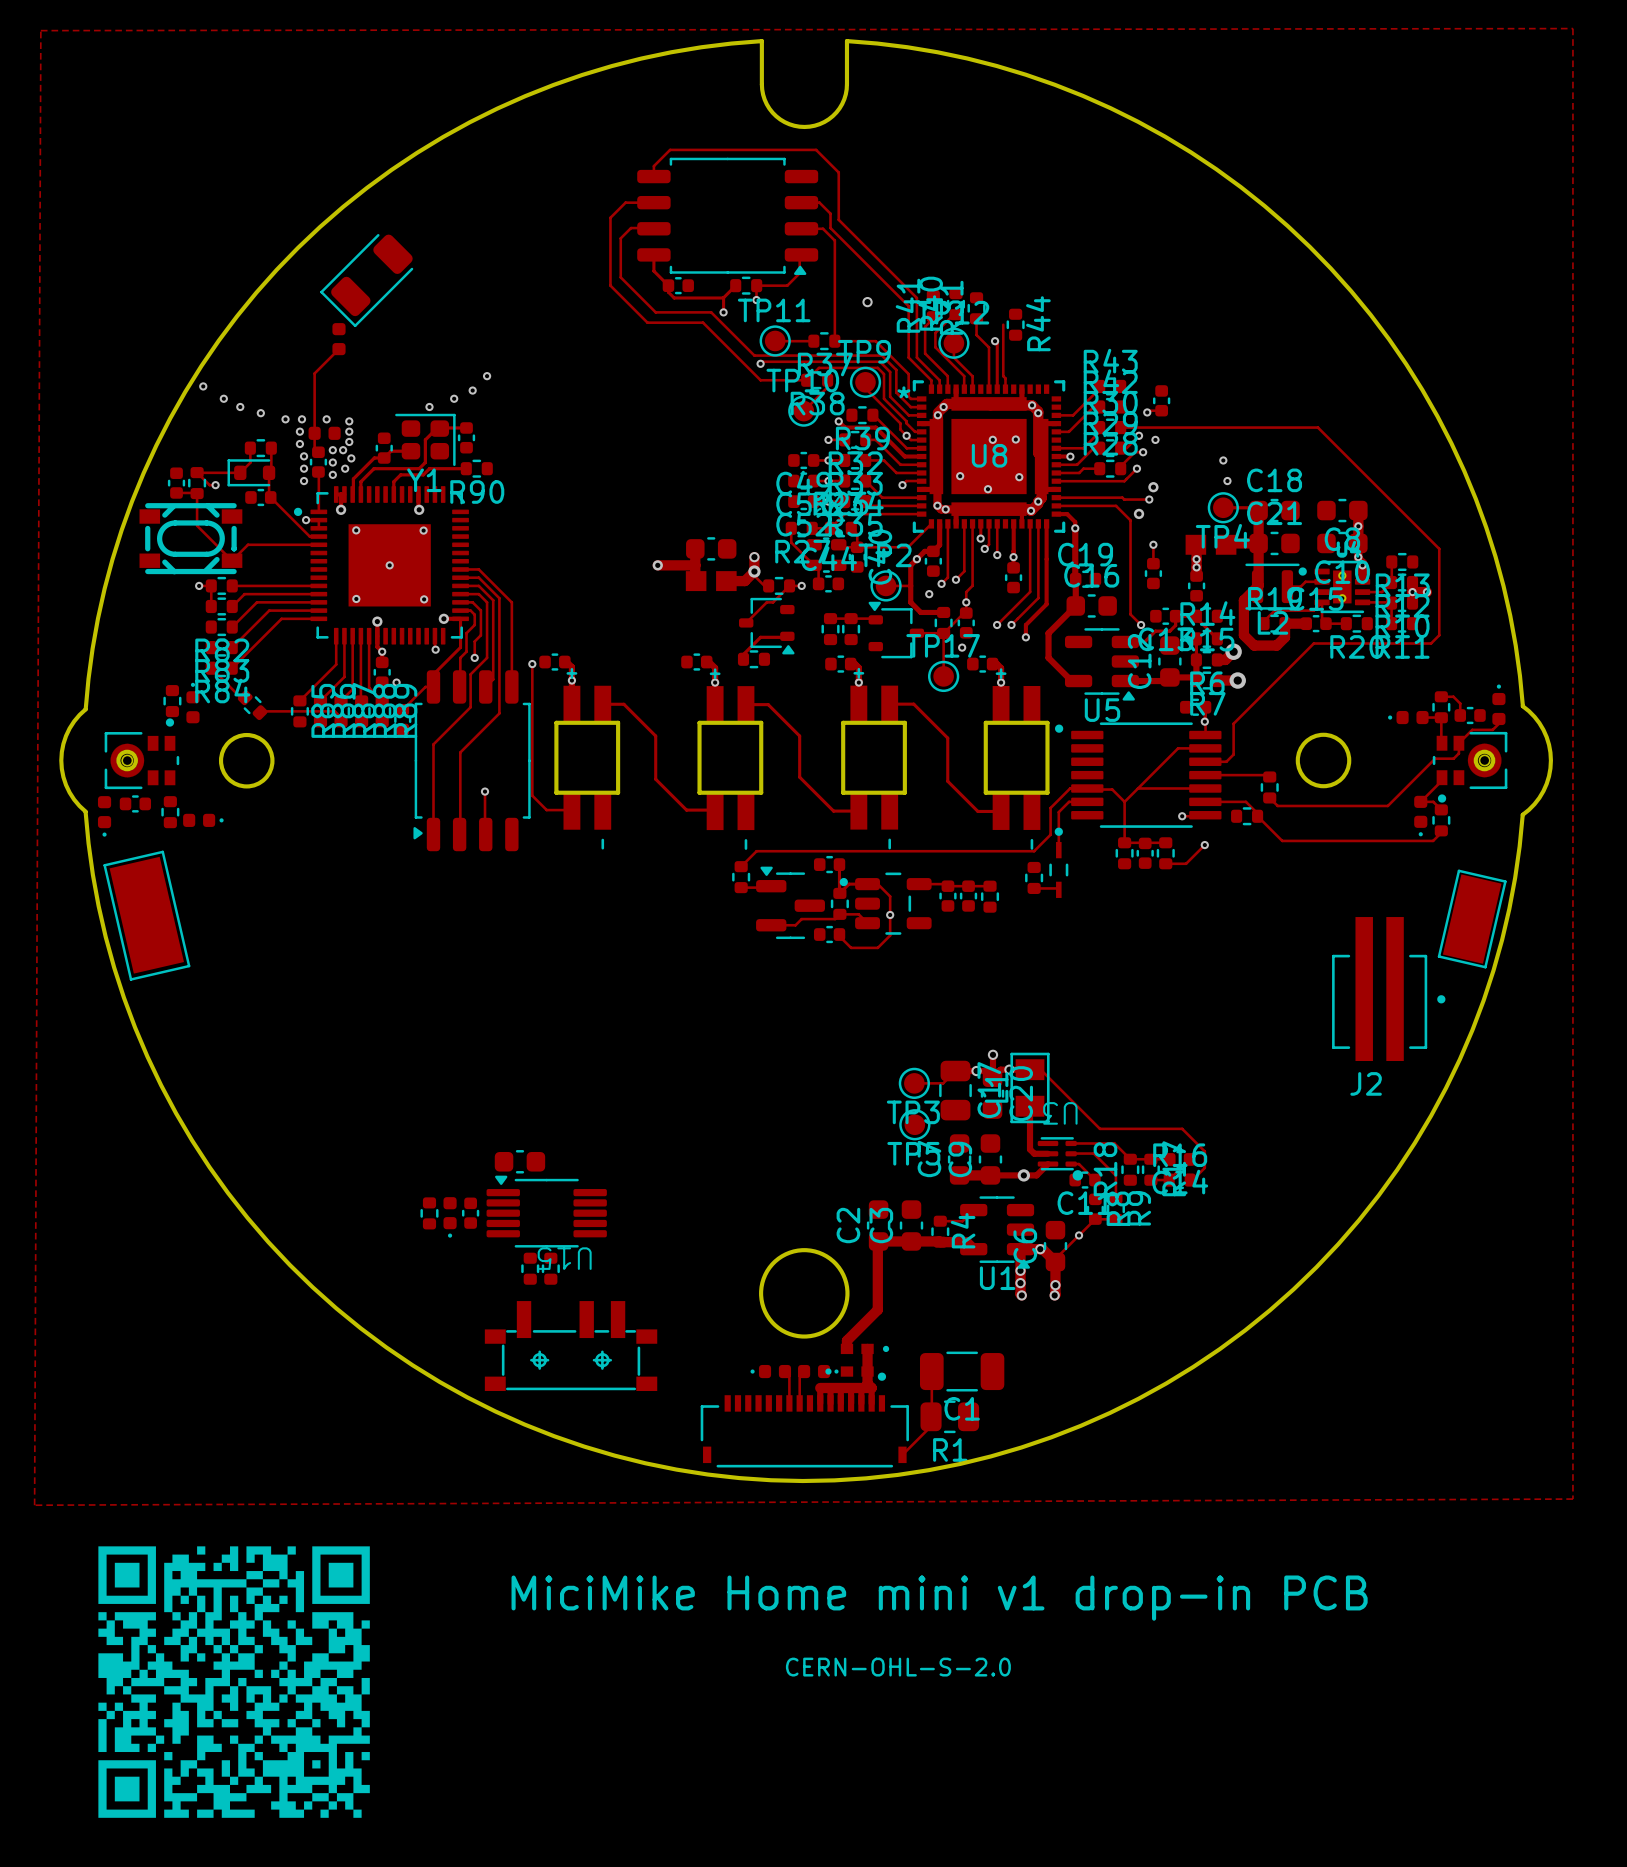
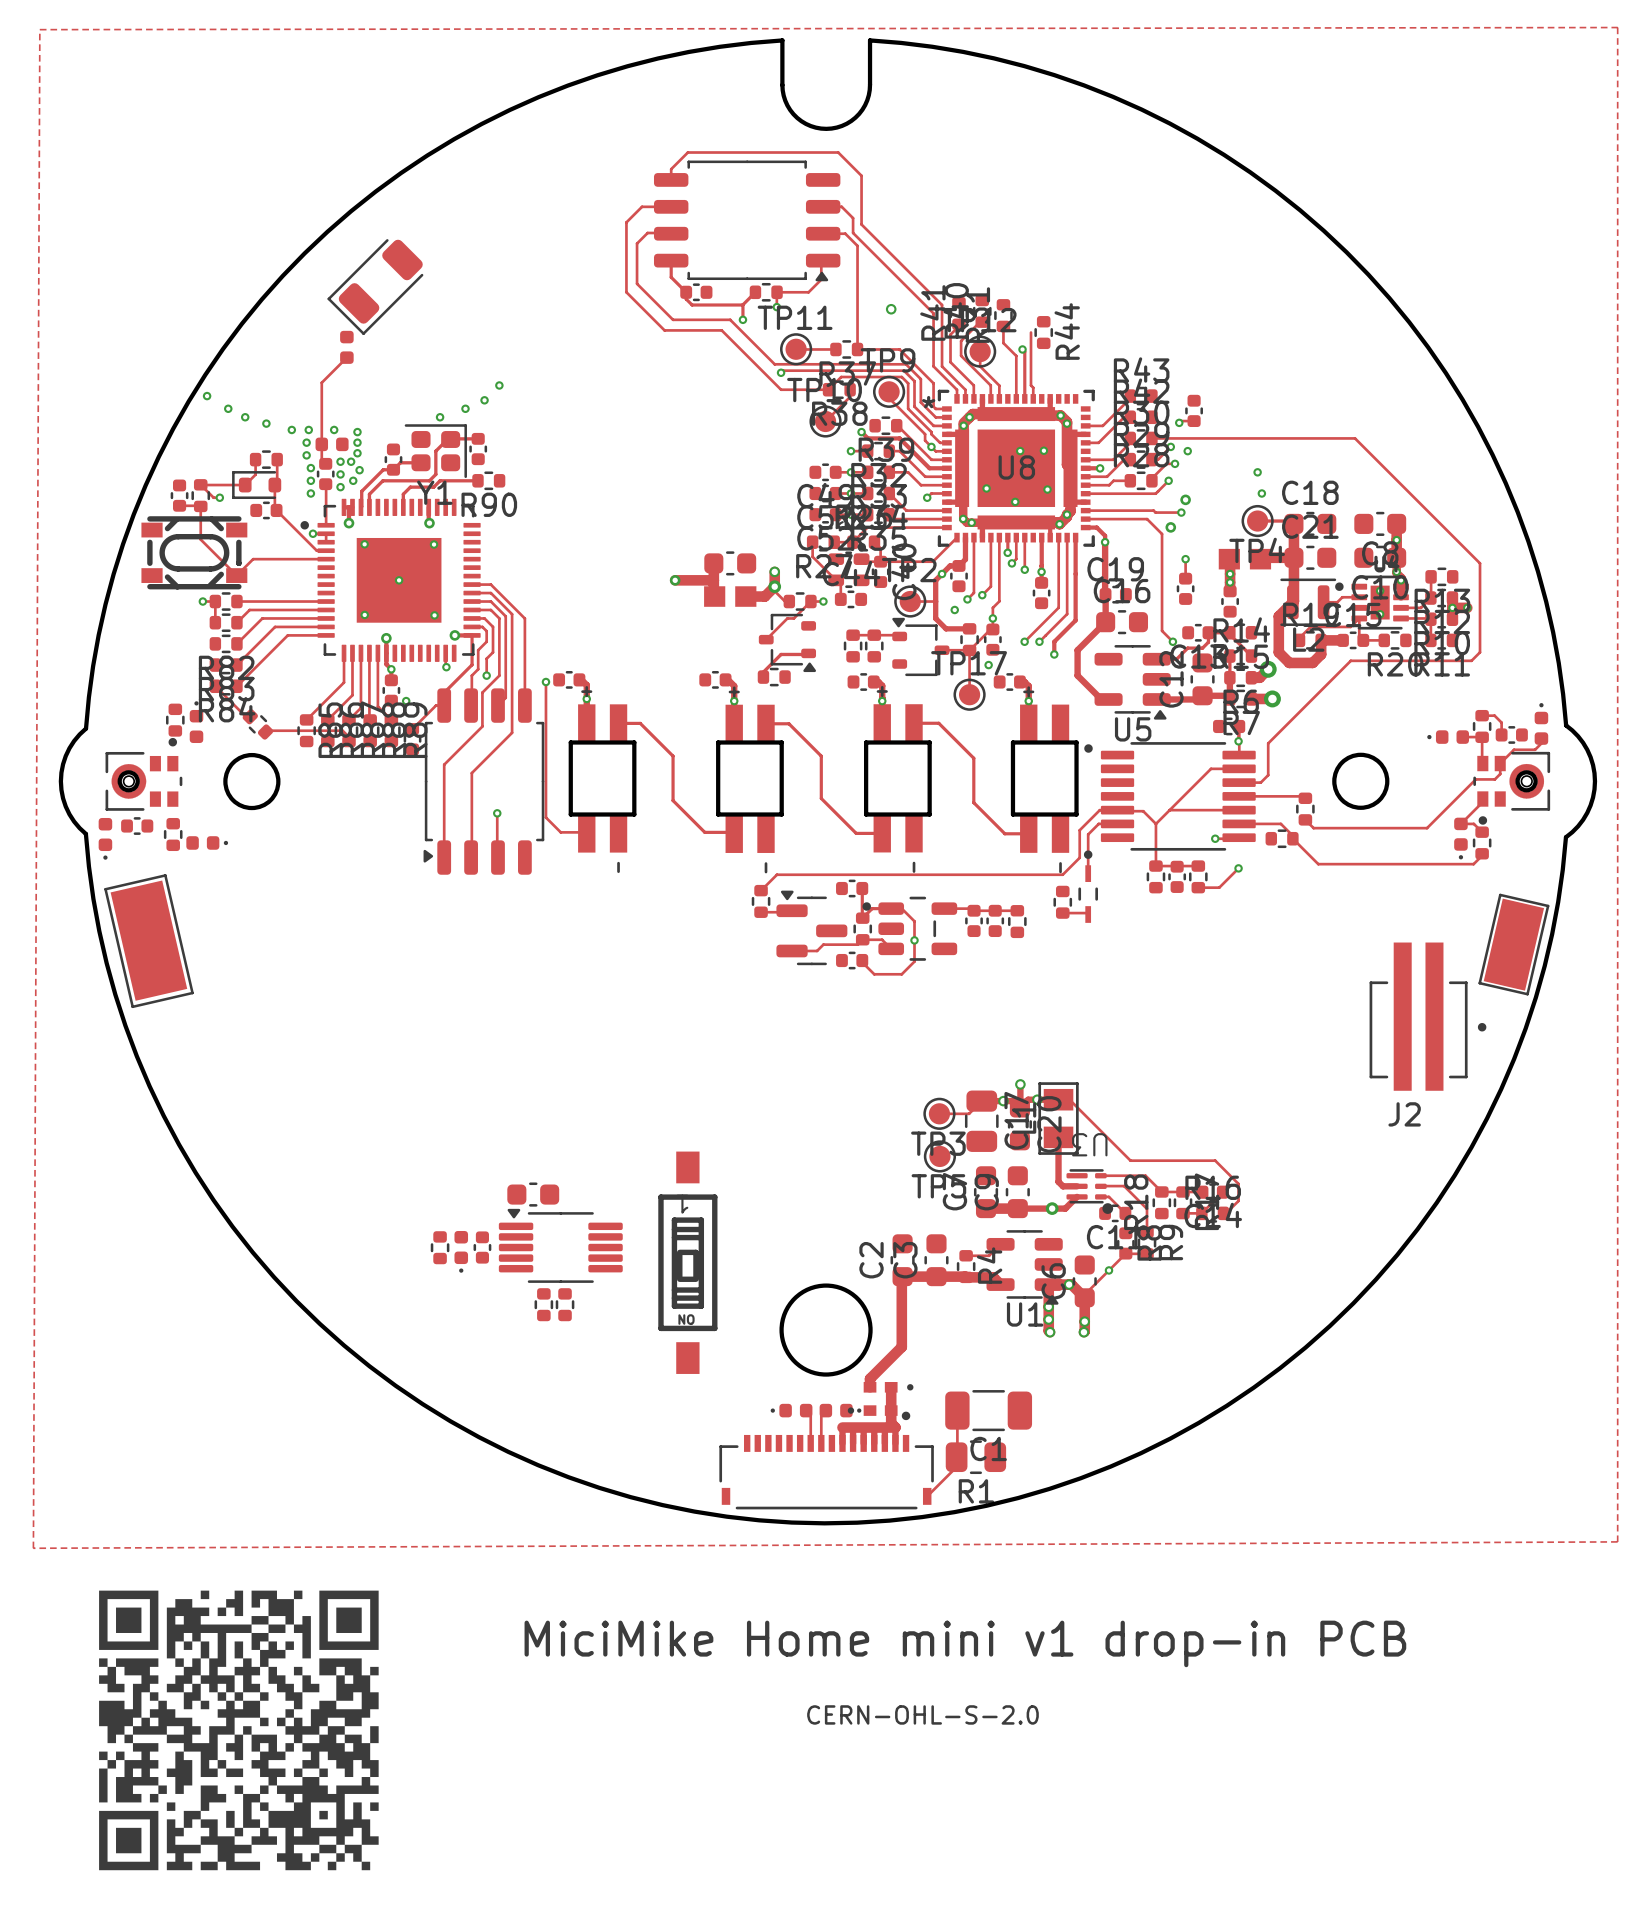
part: none -> (687, 1262)
U15: (571, 1346) -> none

